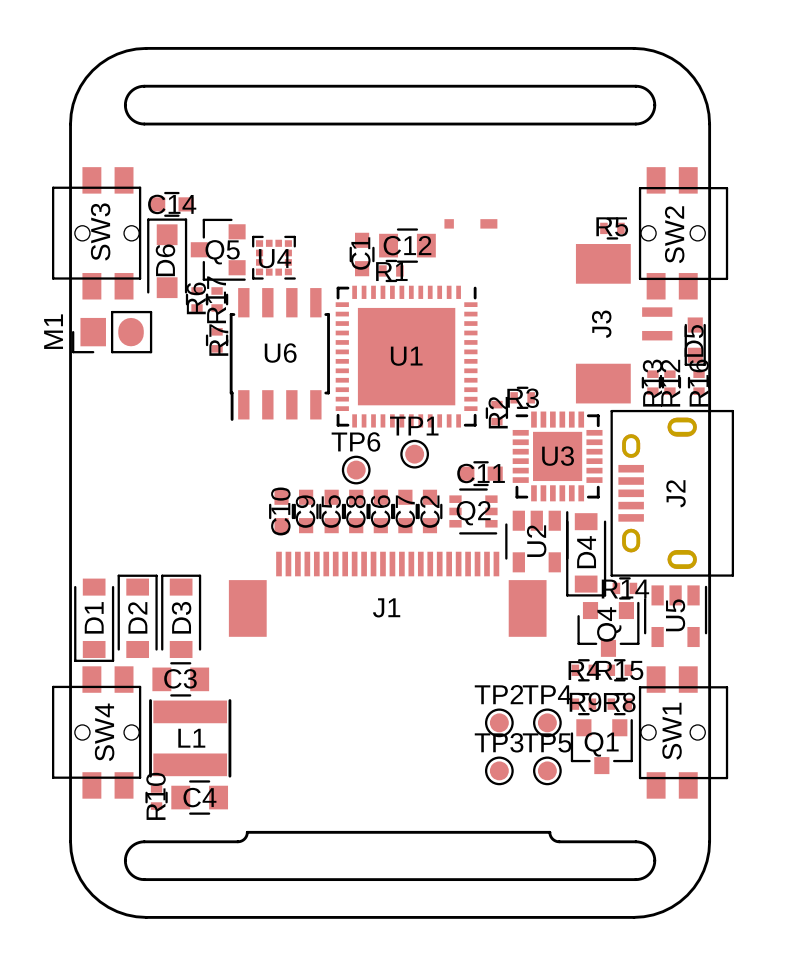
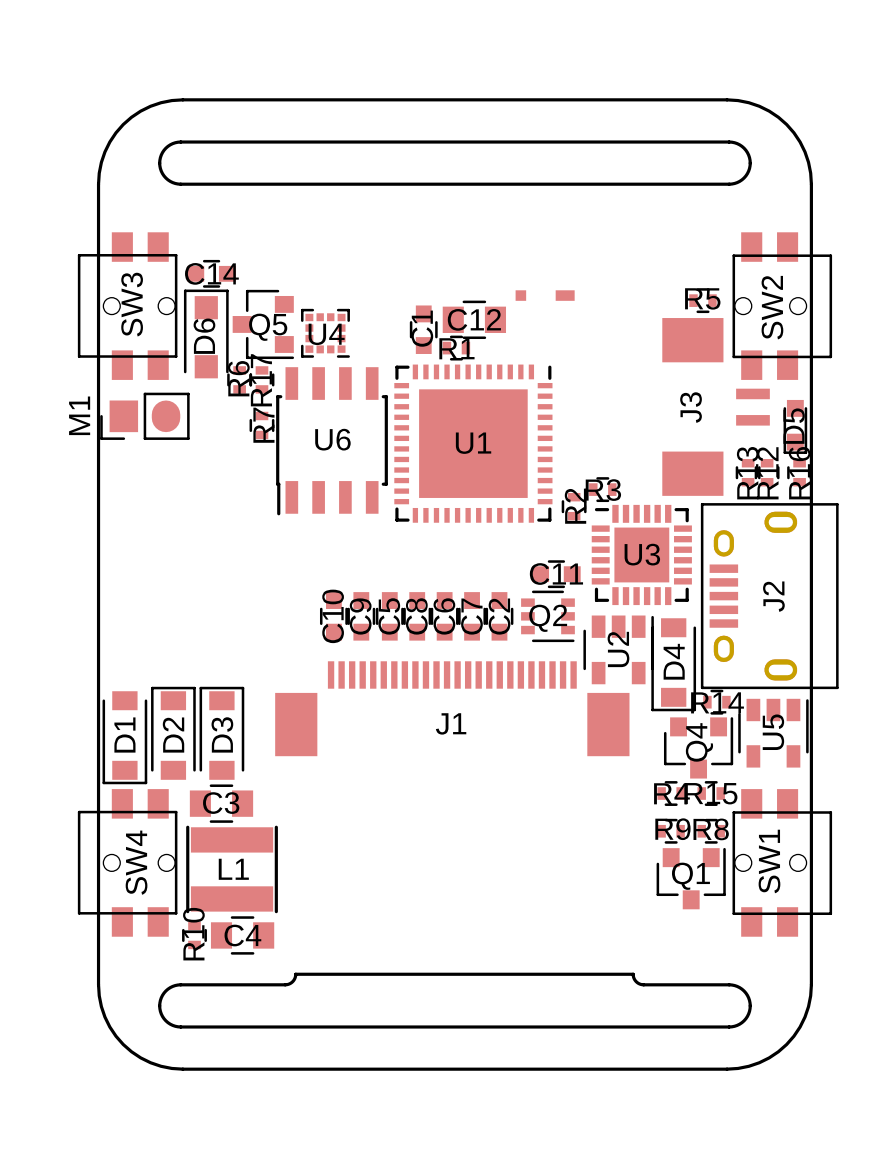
TP1: (414, 454) -> none
TP6: (356, 470) -> none
TP2: (499, 722) -> none
TP4: (547, 722) -> none
TP3: (499, 770) -> none
TP5: (547, 770) -> none

